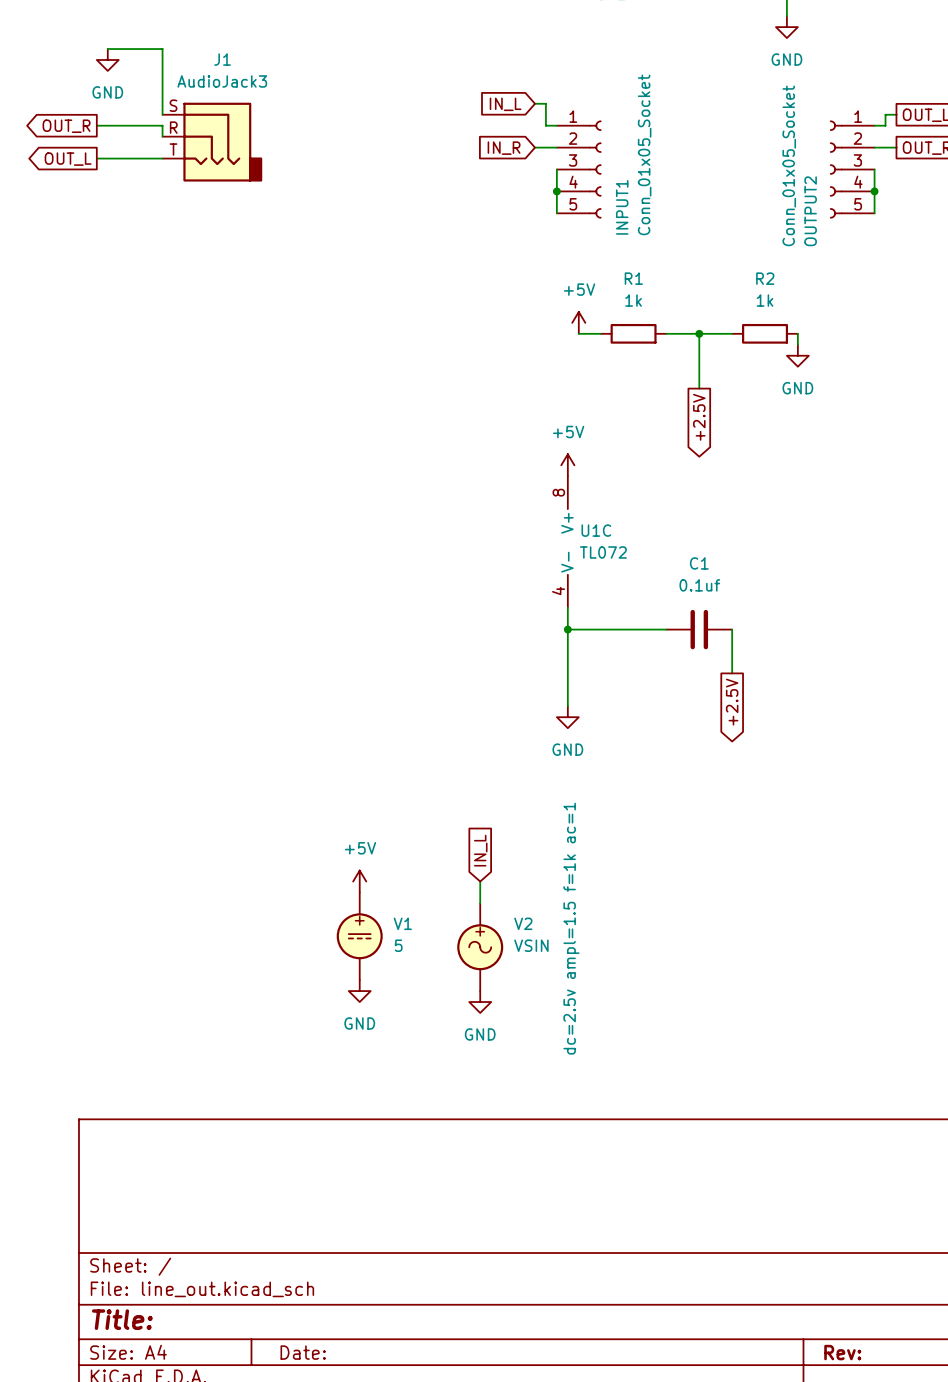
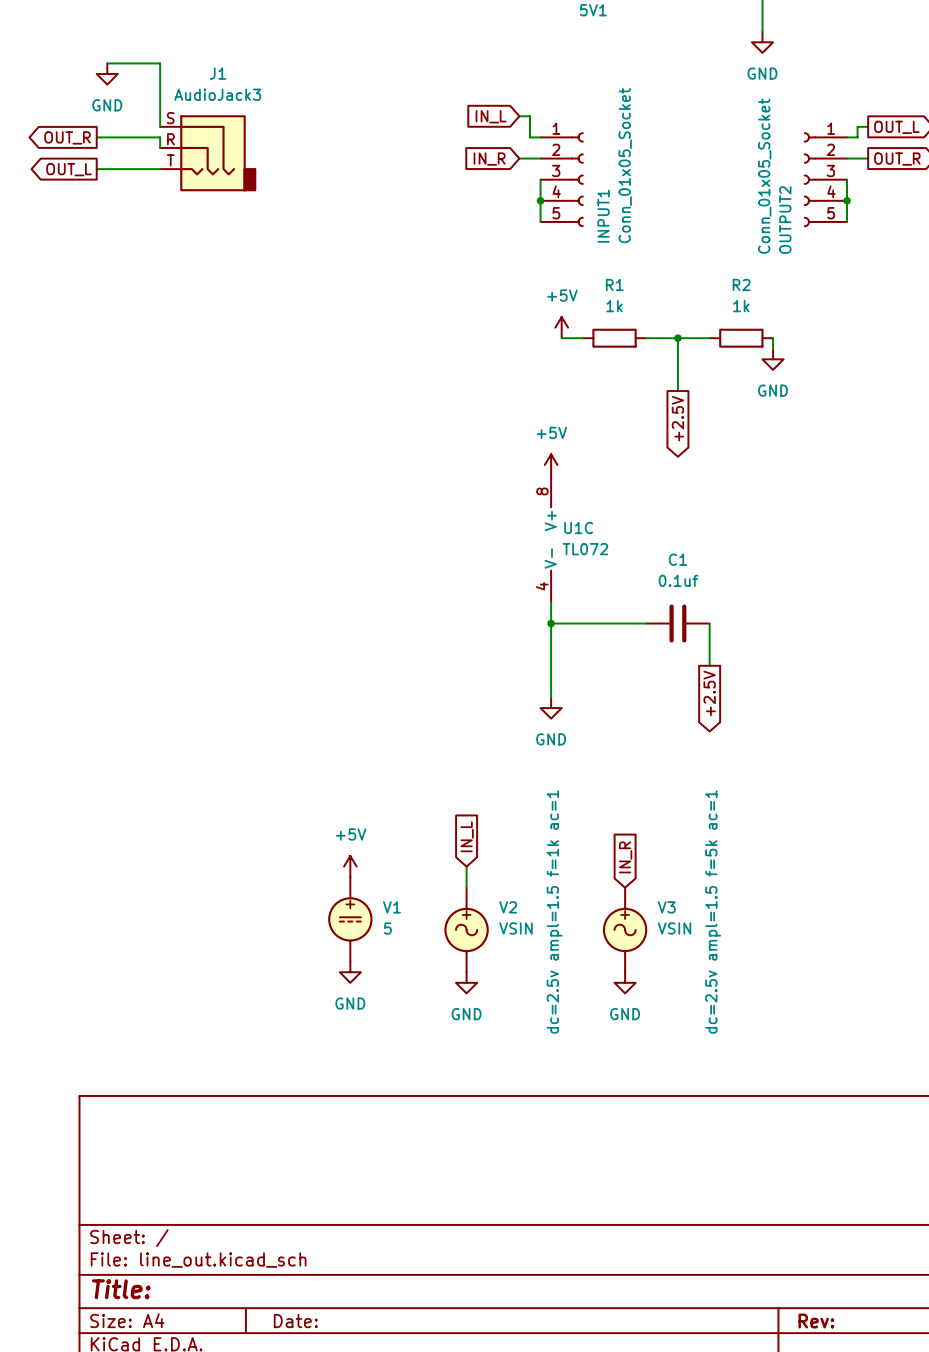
global label: none -> IN_R (625, 857)
V3: none -> VSIN (625, 929)
power symbol: none -> GND (625, 982)

